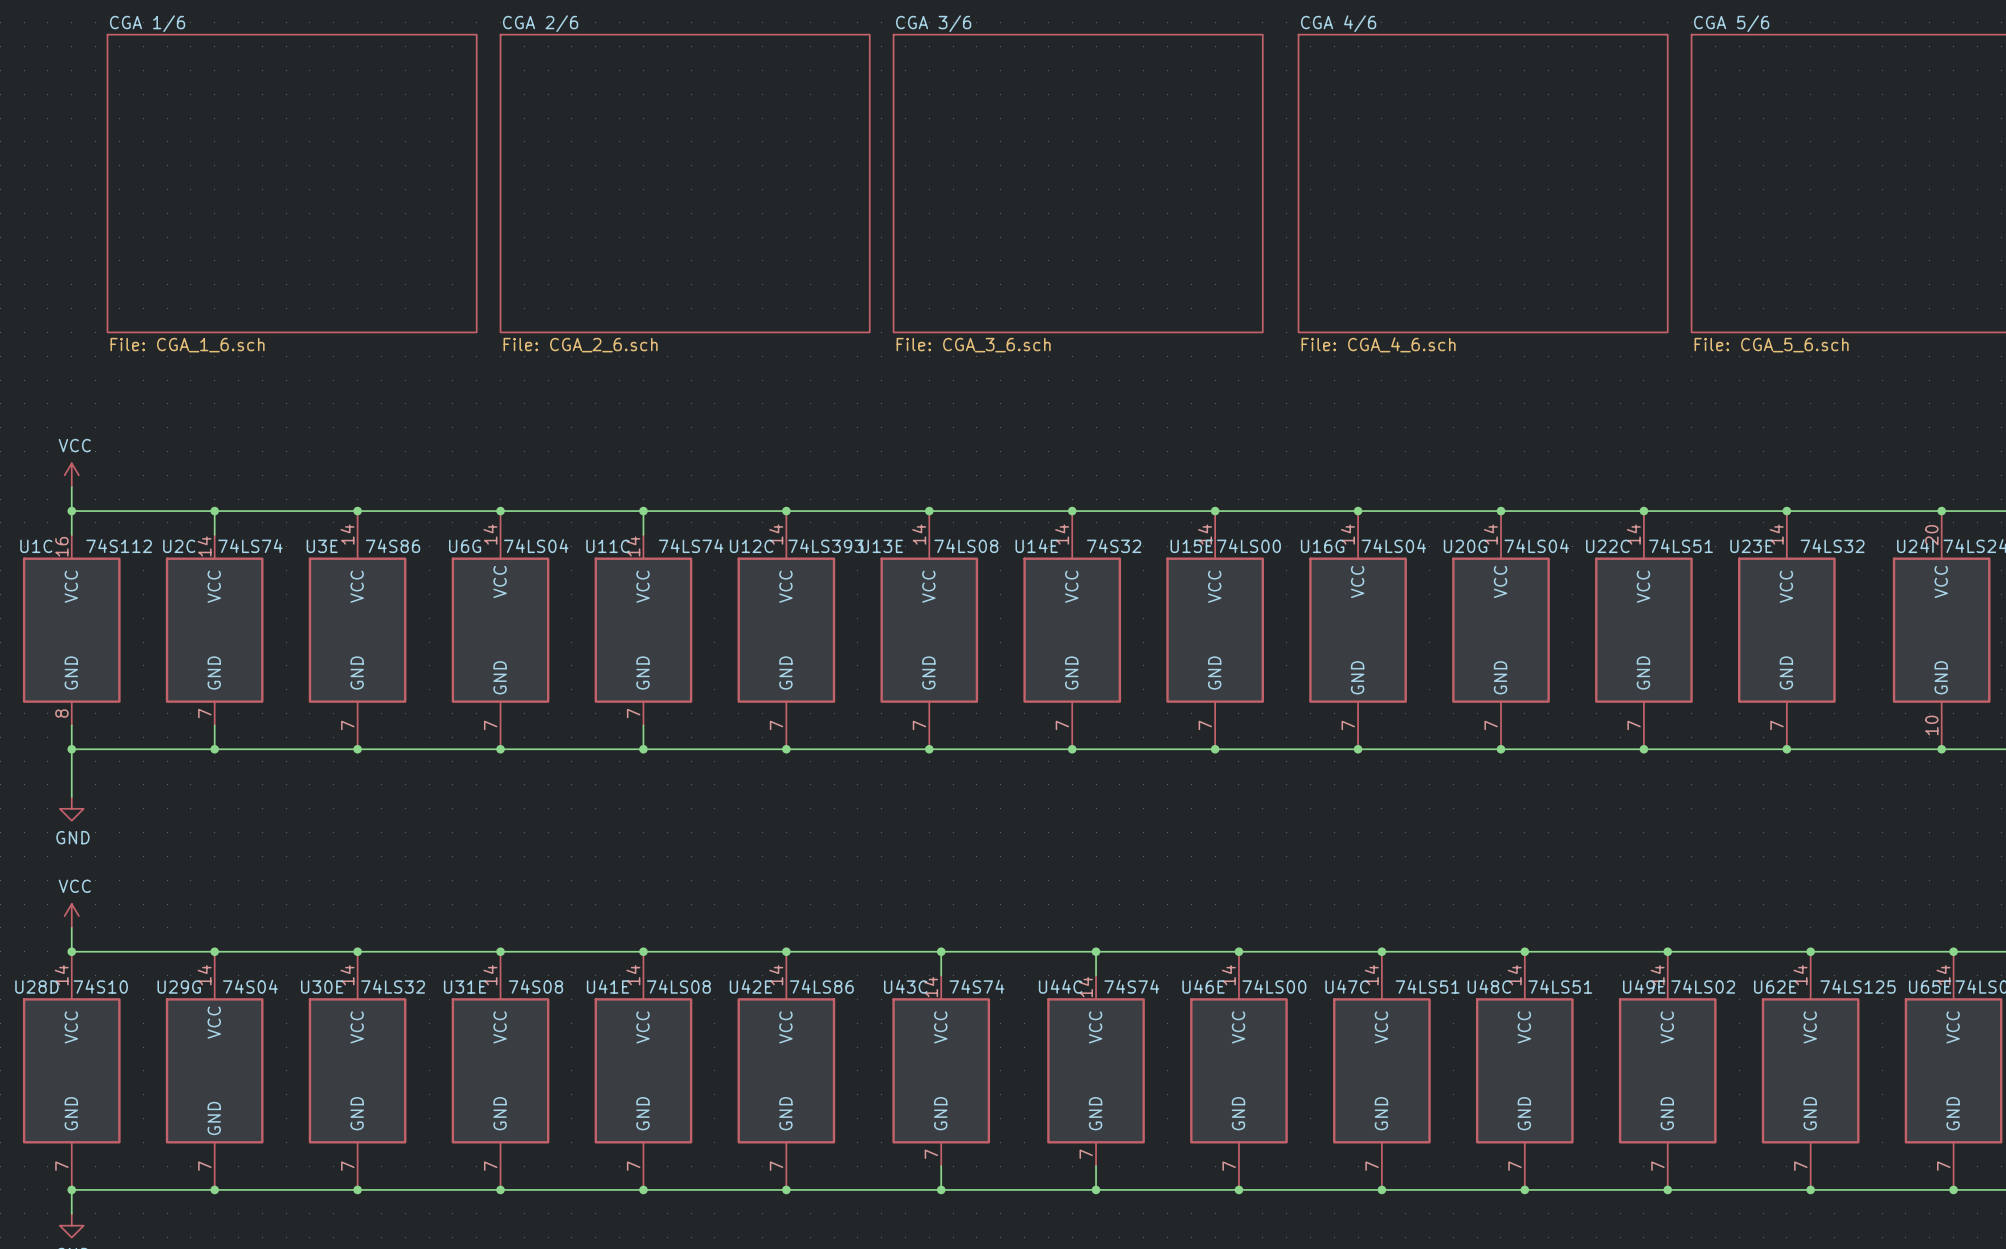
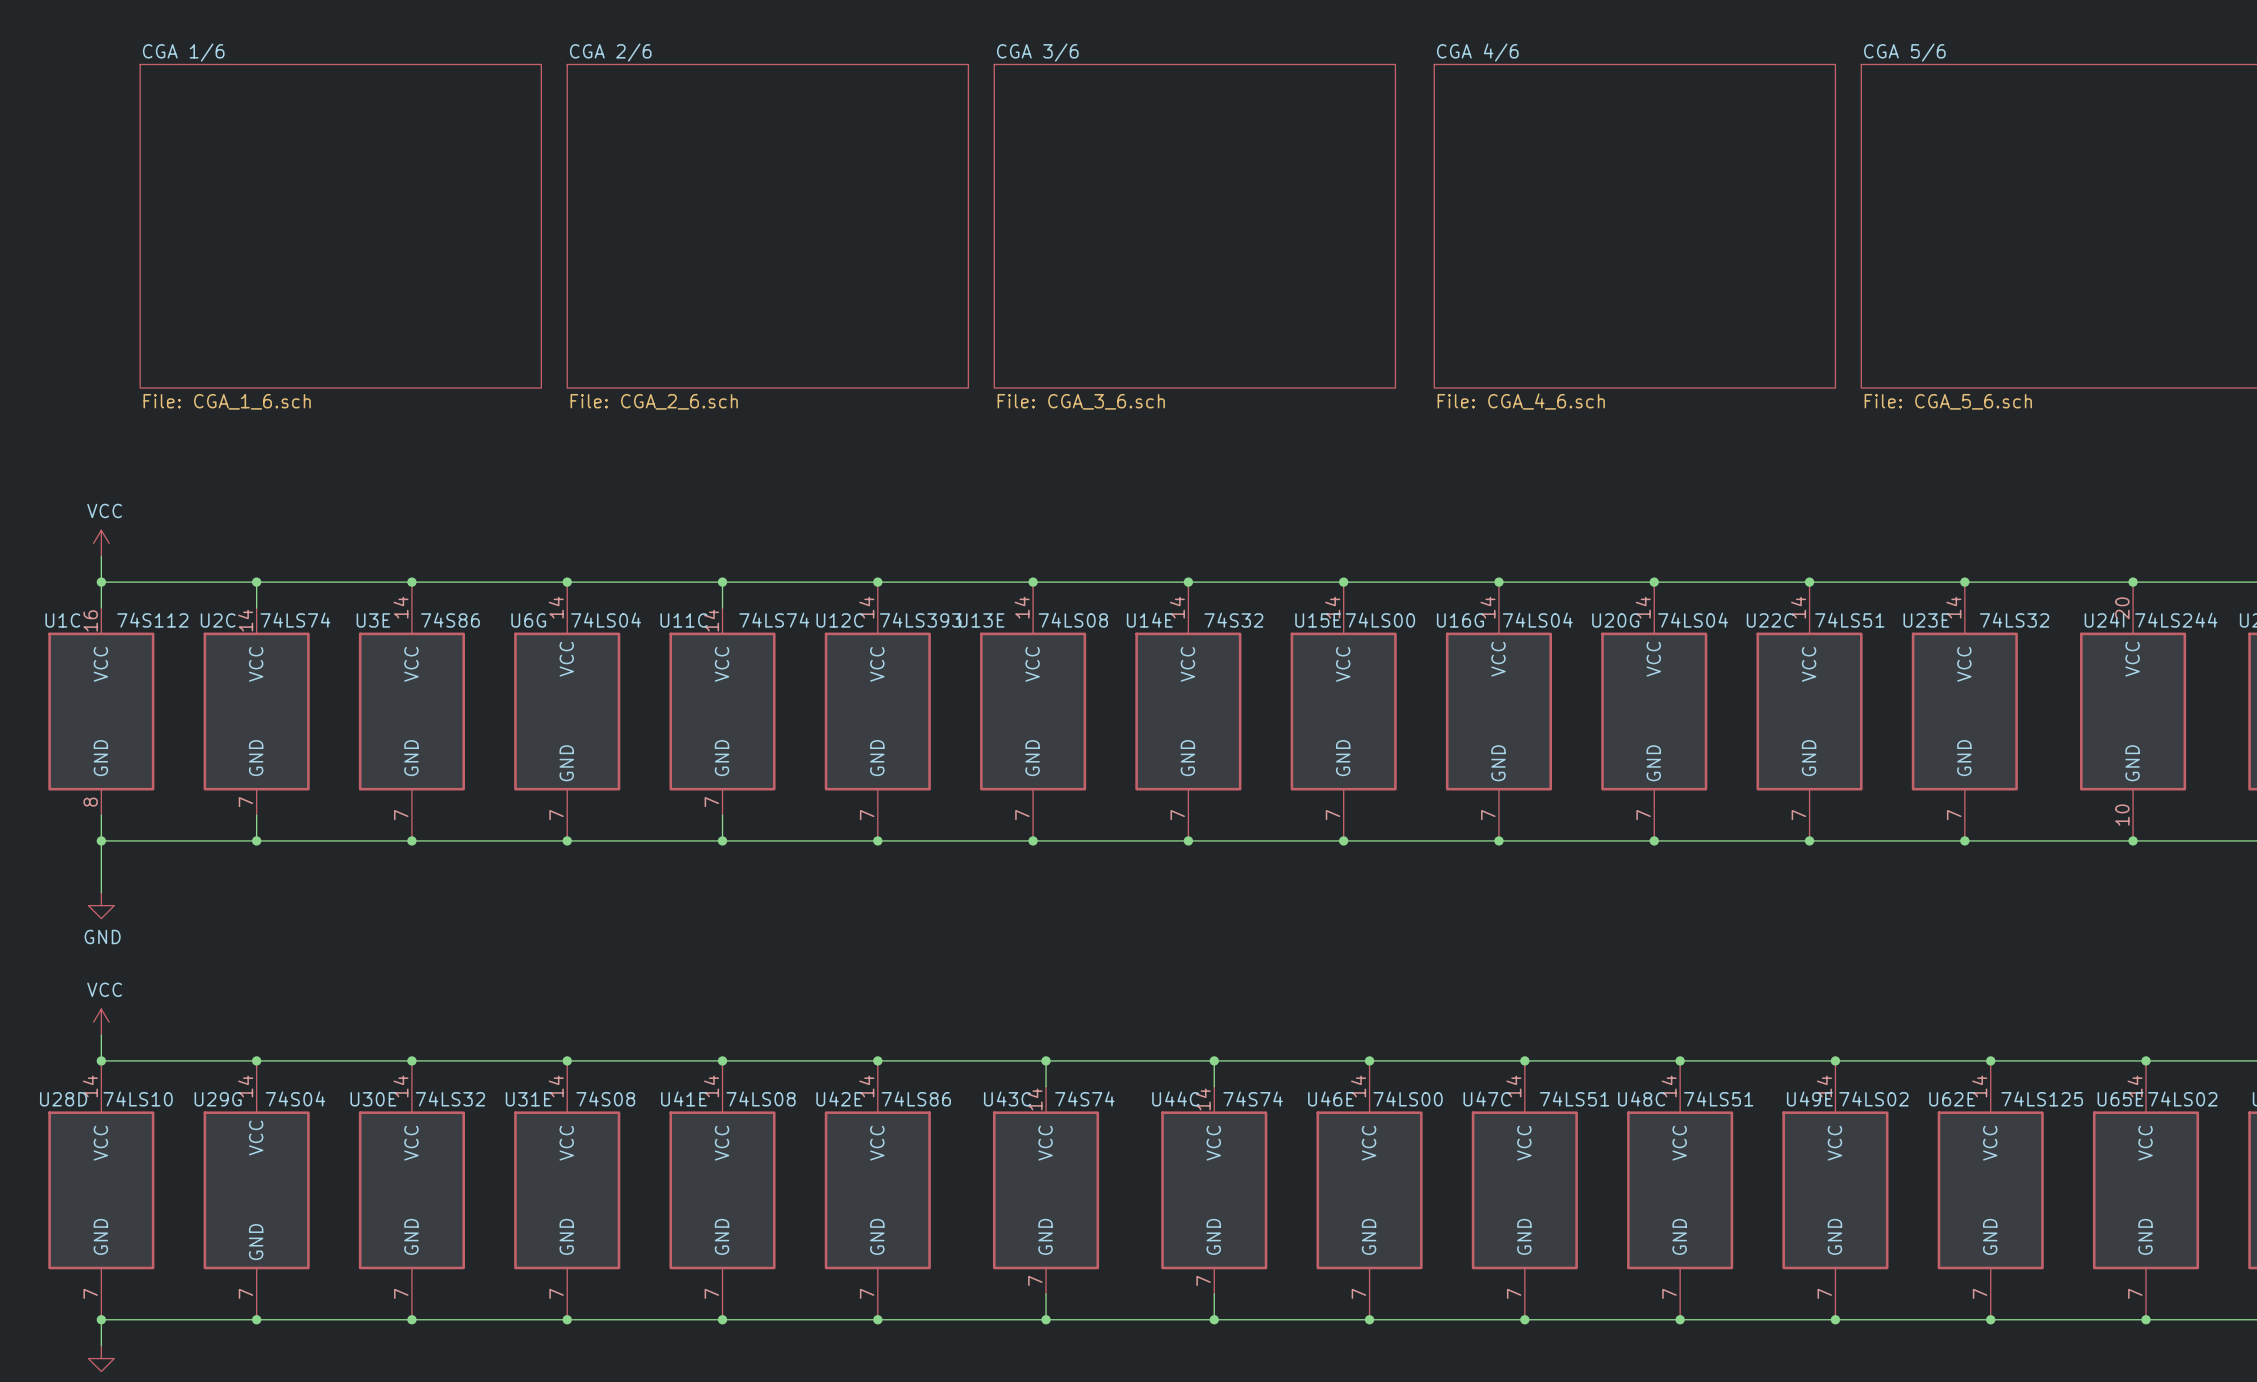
U28D value: 74S10 (100, 986) -> 74LS10 (138, 1098)

